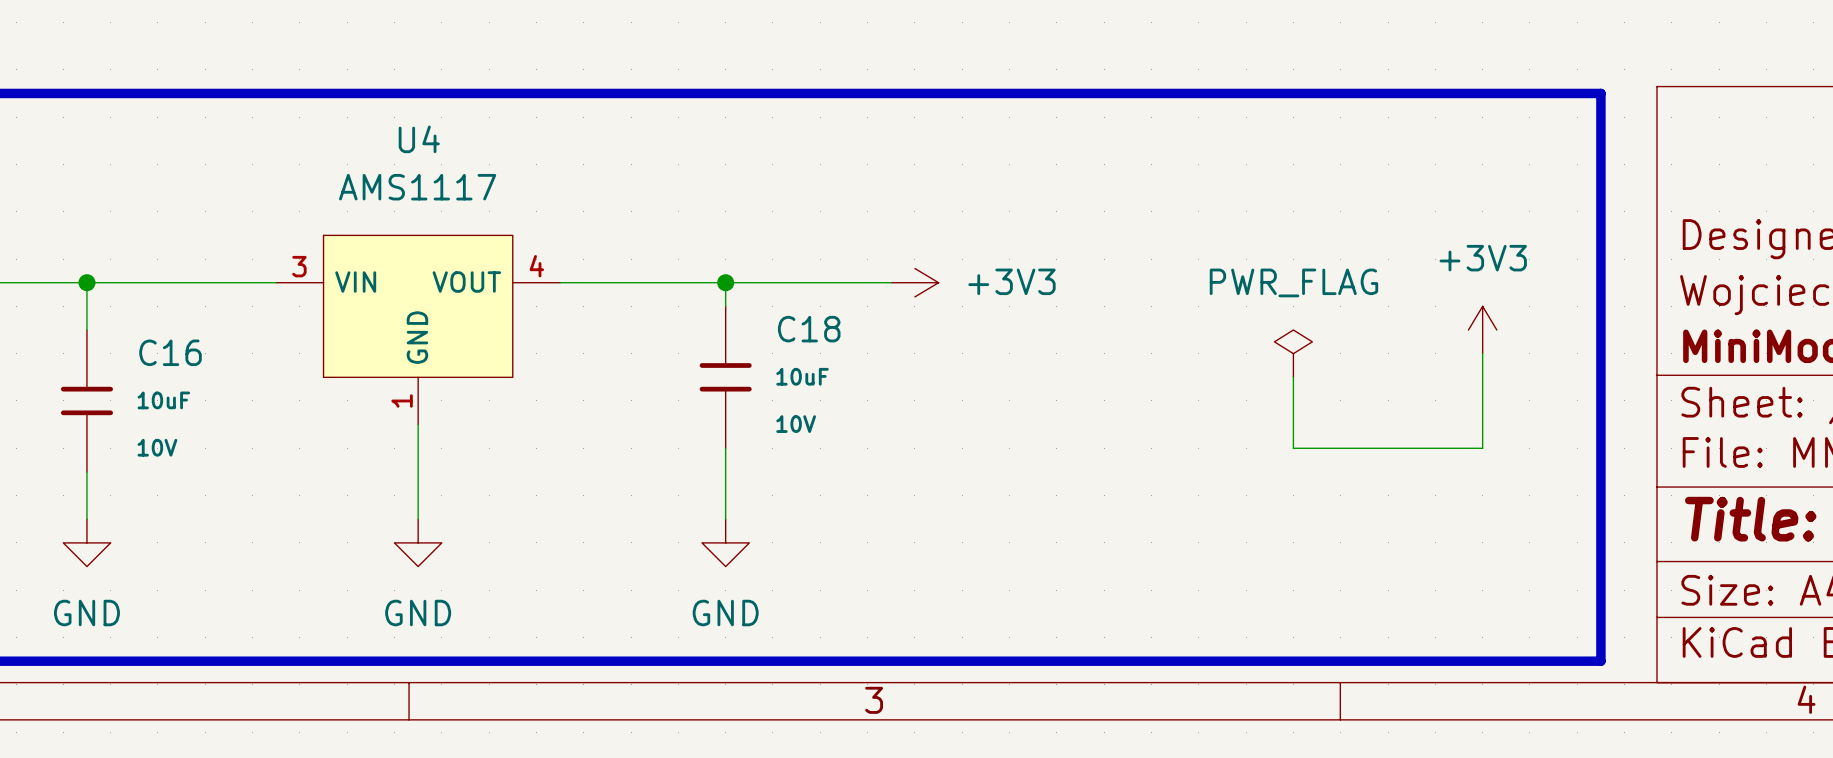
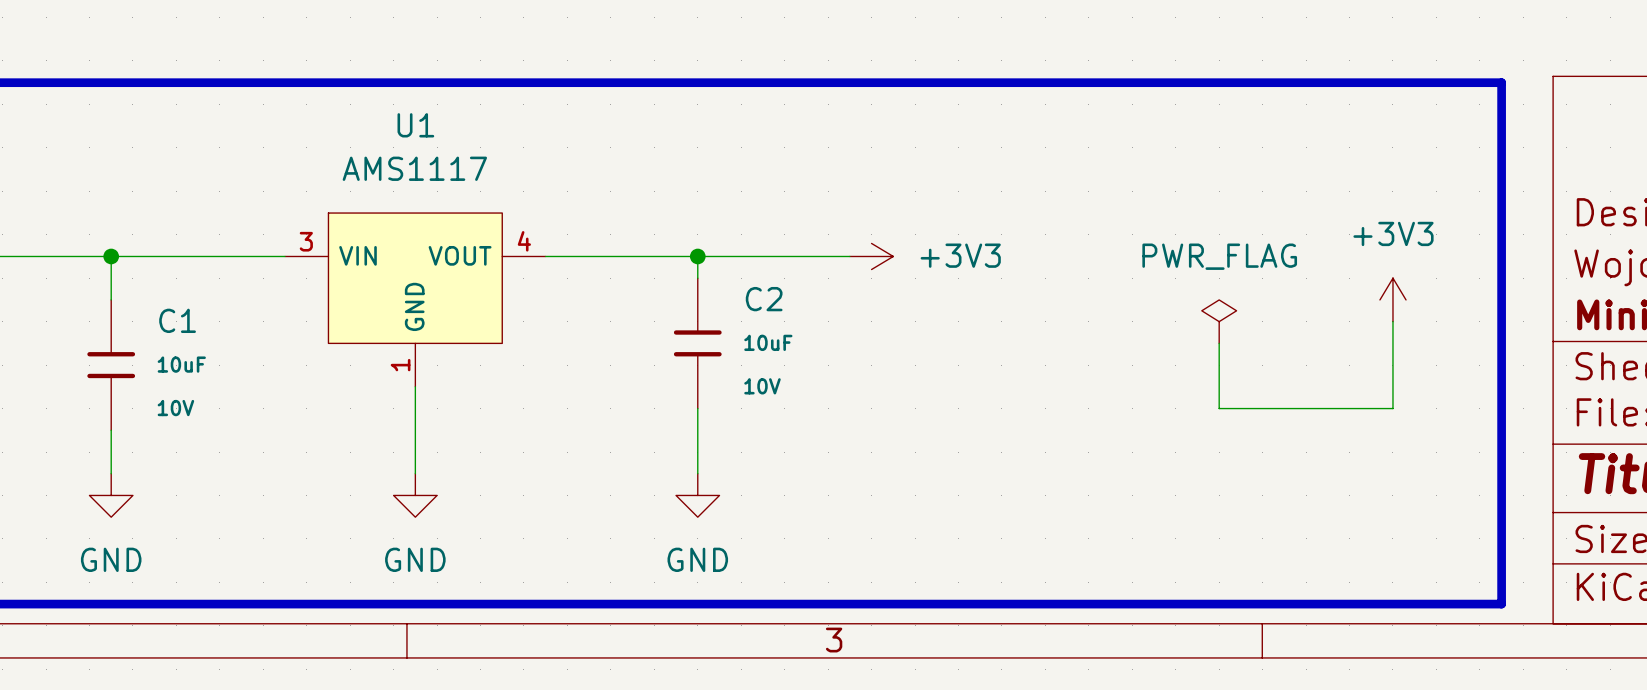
U4 name: U4 (419, 139) -> U1 (415, 125)
C18 name: C18 (809, 329) -> C2 (764, 299)
C16 name: C16 (170, 352) -> C1 (177, 320)

